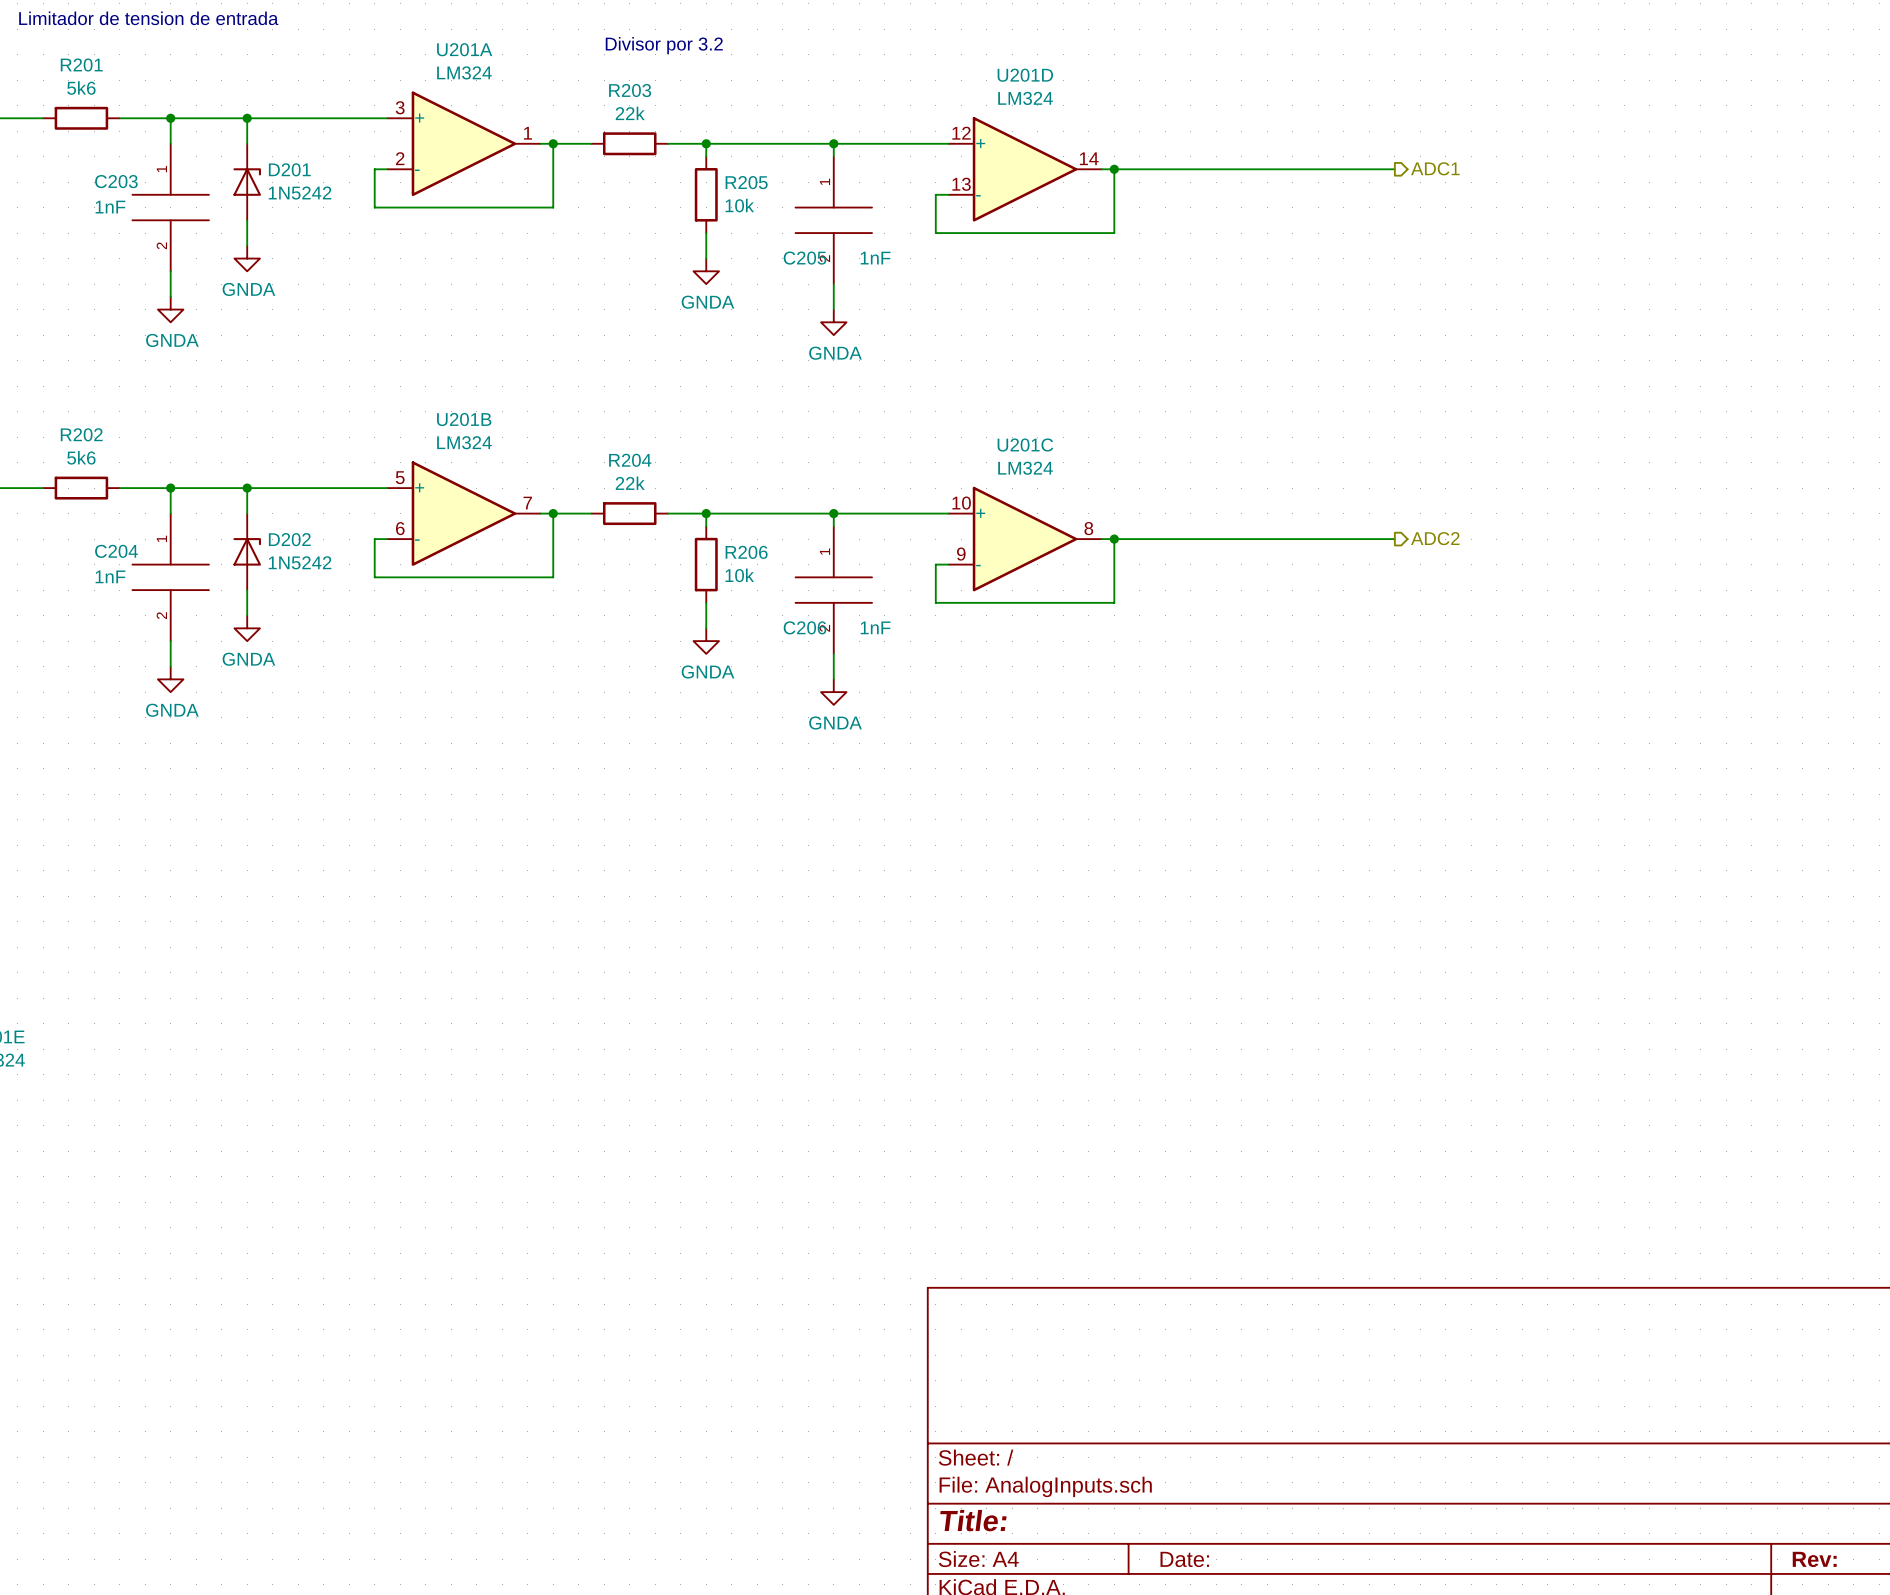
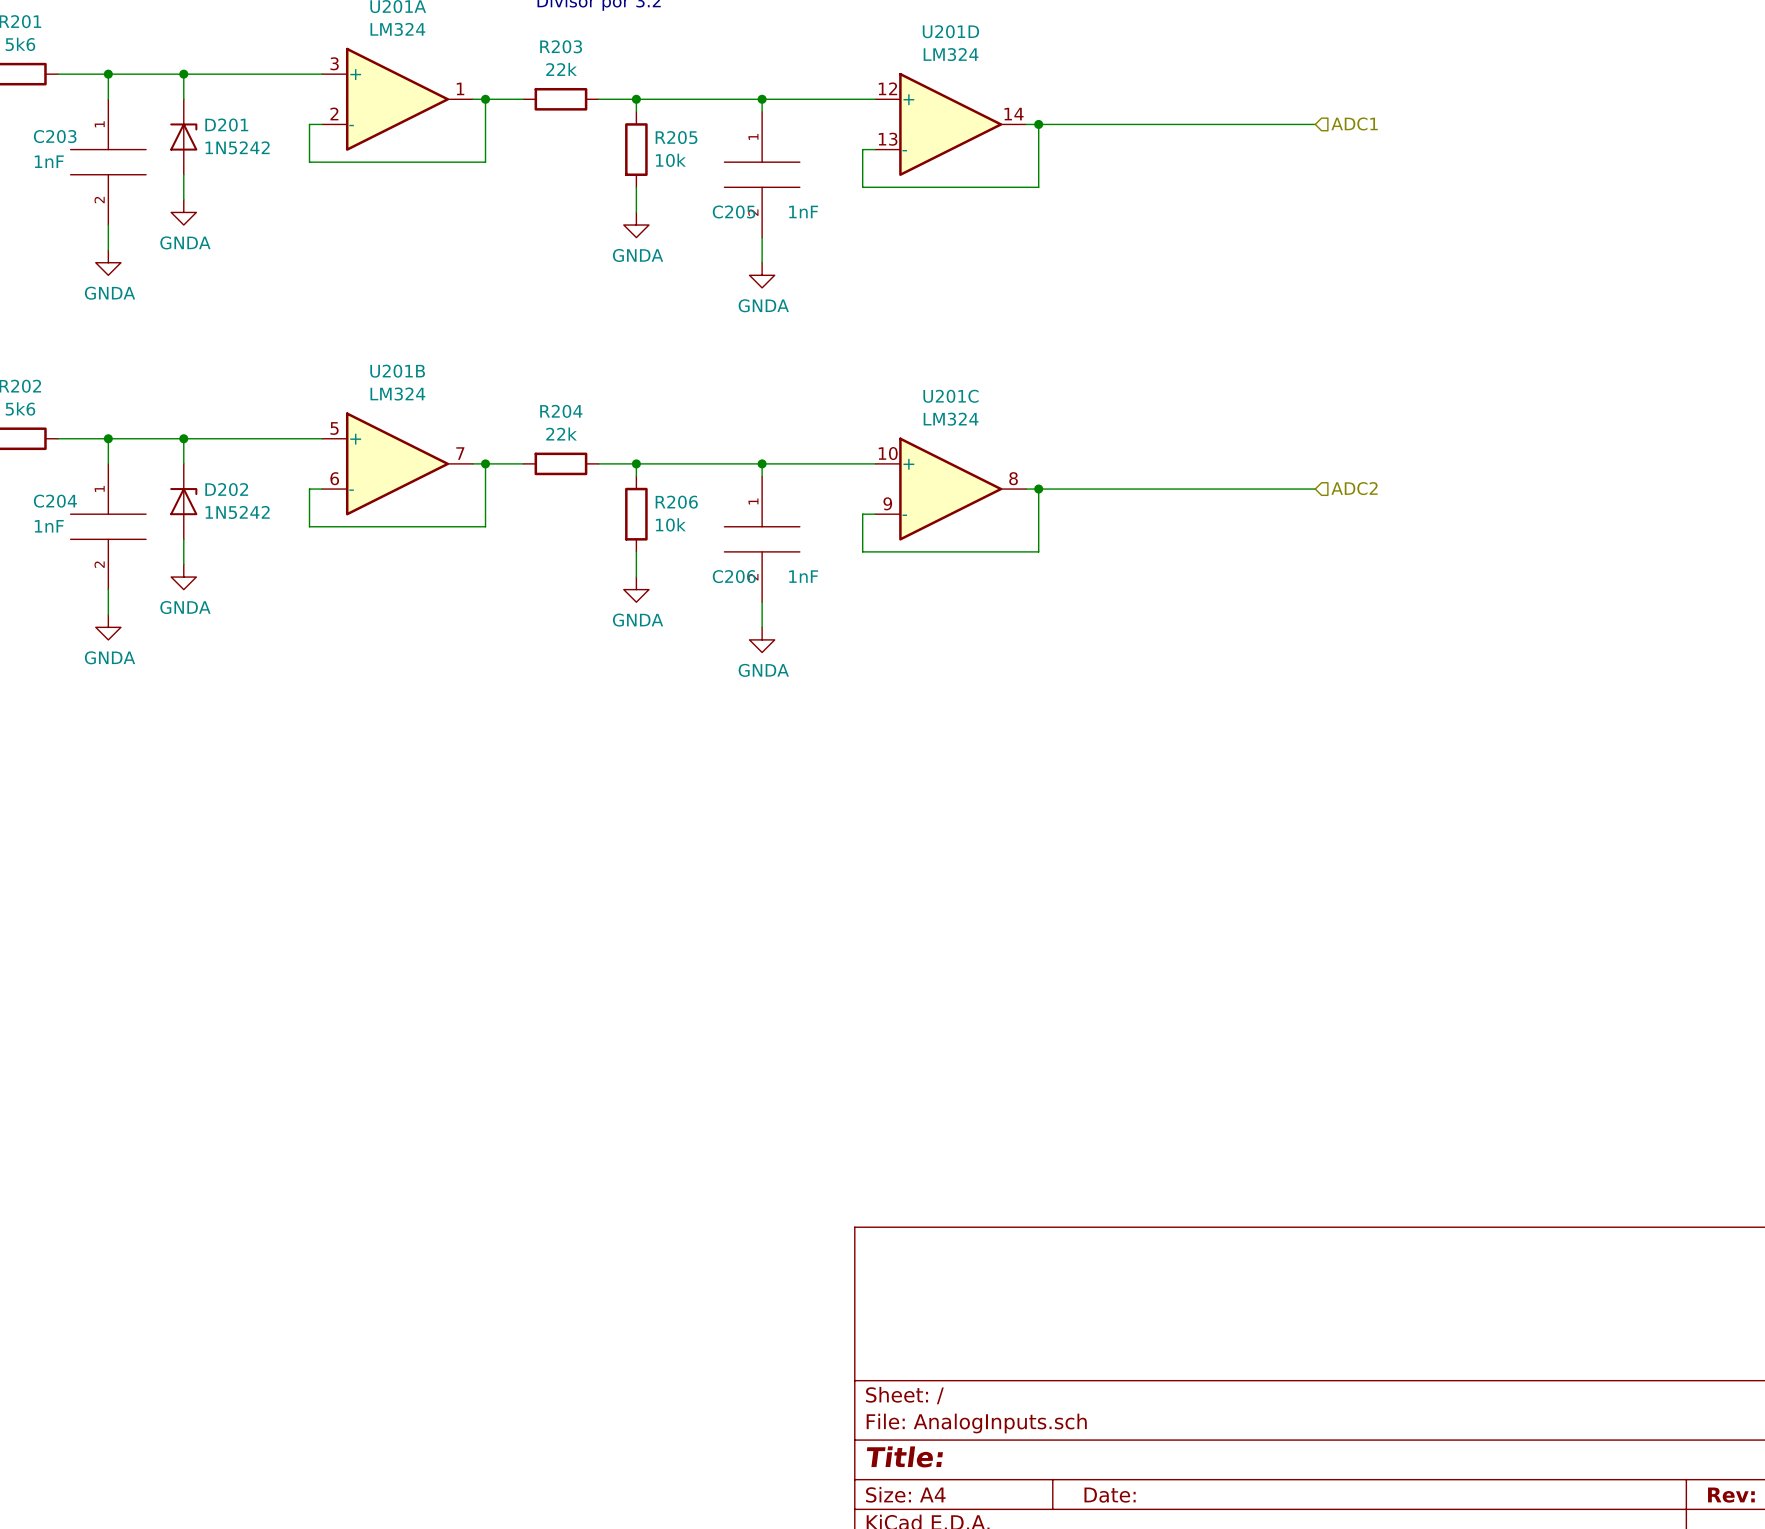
hierarchical label shape: output (1435, 168) -> input (1354, 123)
hierarchical label shape: output (1435, 538) -> input (1354, 488)

